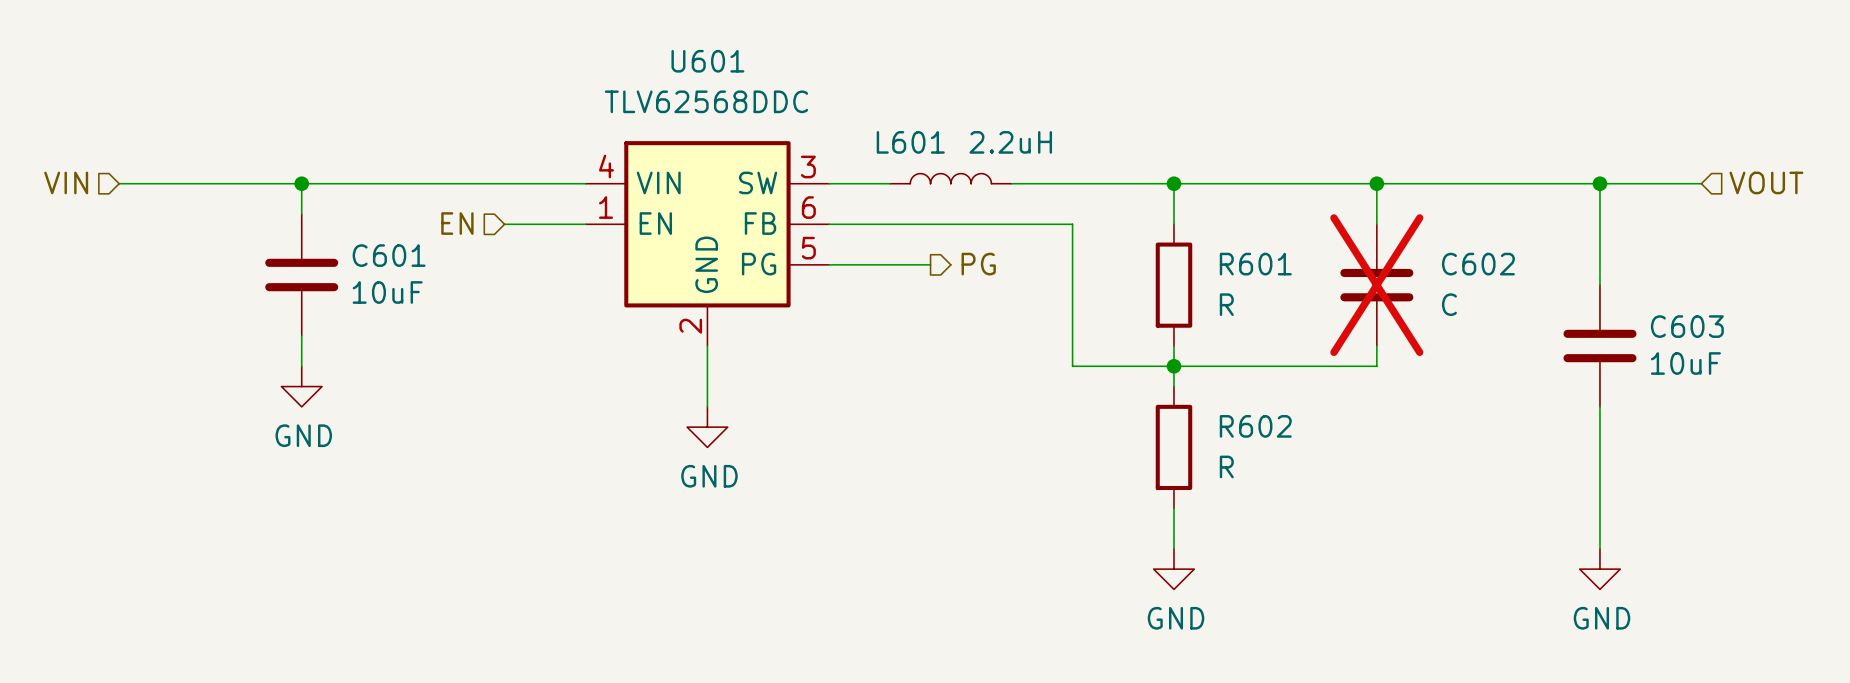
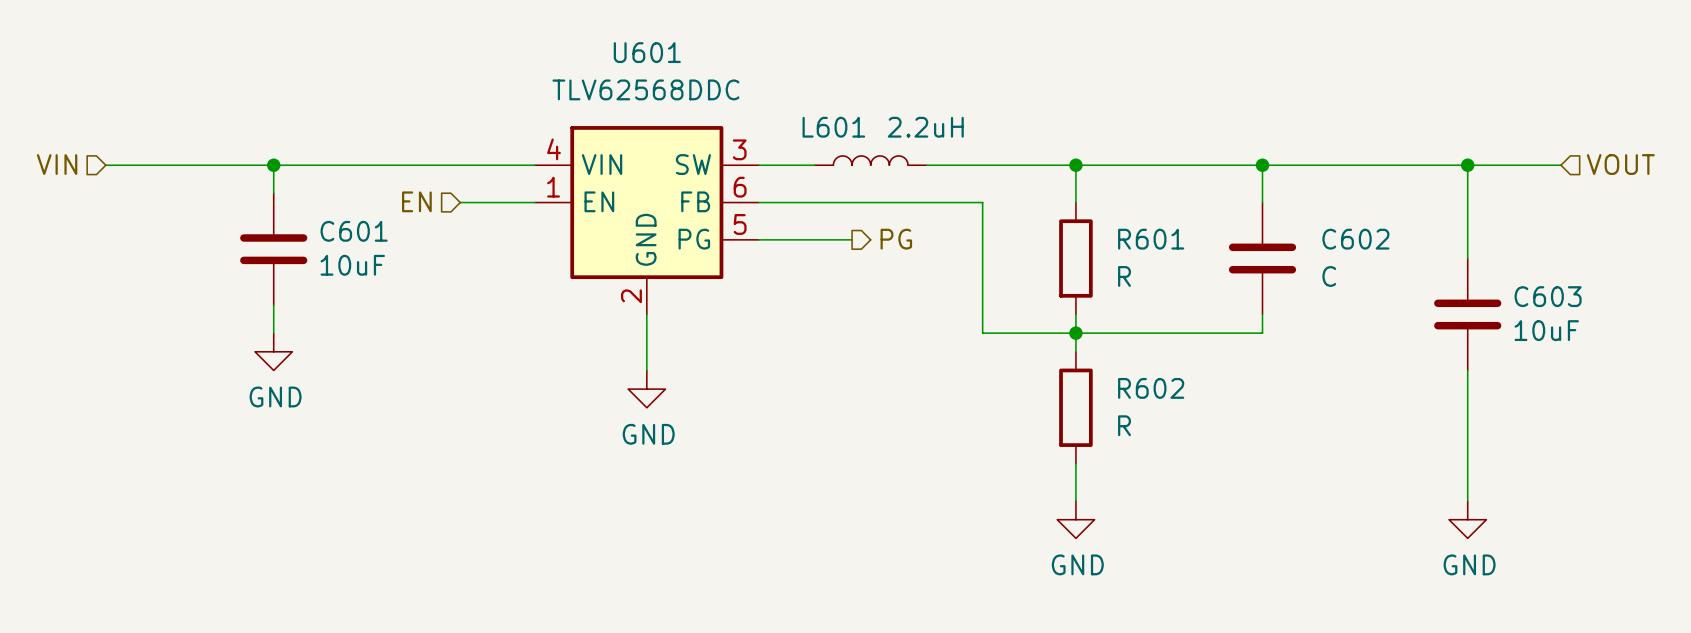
C602 do-not-place cross: (1376, 285) -> none

